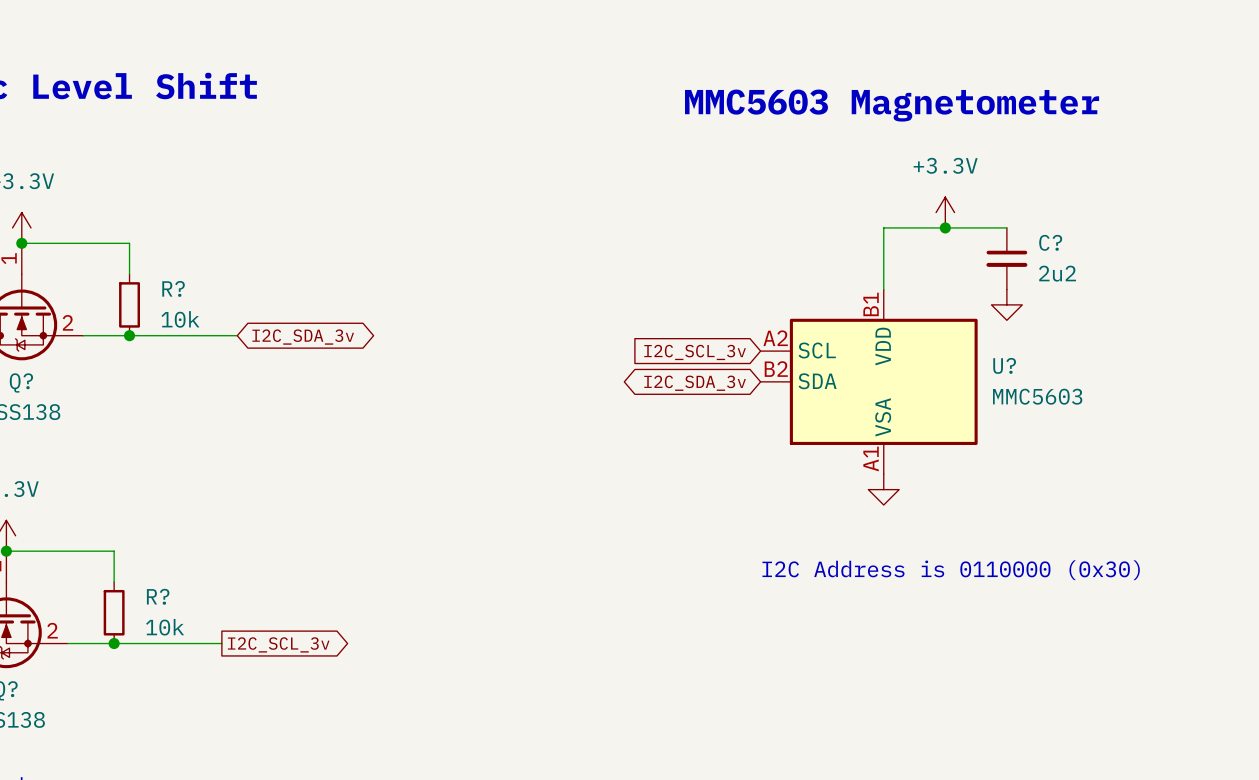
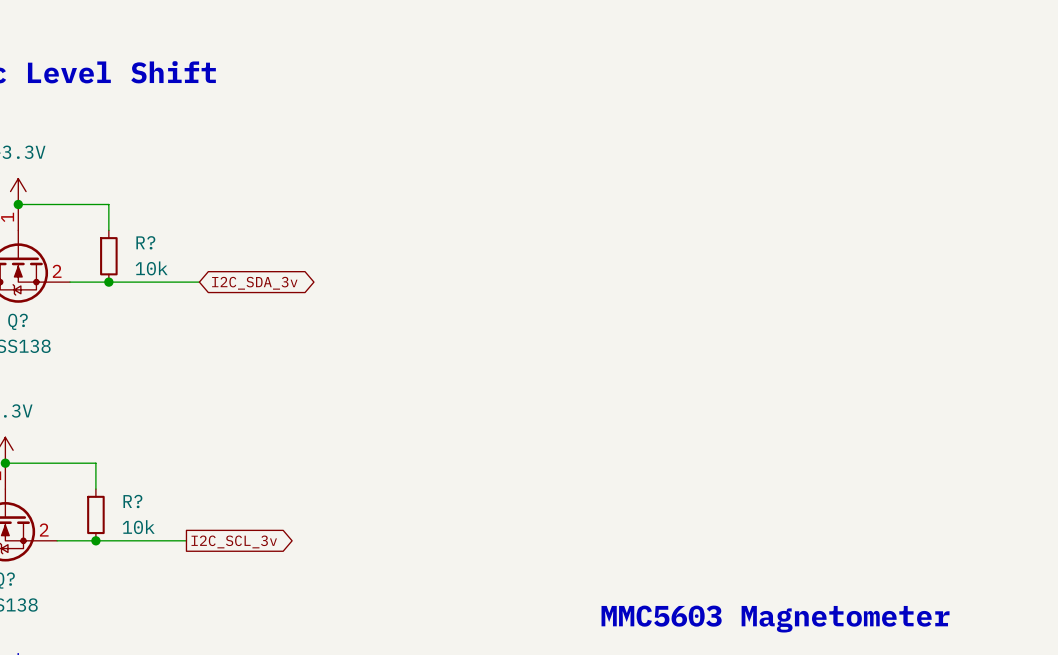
text: MMC5603 Magnetometer (892, 105) -> none
power symbol: +3.3V (945, 212) -> none
junction: (945, 227) -> none
wire: (1006, 227) (883, 227) (883, 289) -> none
C?: 2u2 (1006, 258) -> none
power symbol: (1006, 304) -> none
global label: I2C_SCL_3v (695, 352) -> none
U?: MMC5603 (869, 381) -> none
global label: I2C_SDA_3v (695, 383) -> none
power symbol: (883, 489) -> none
text: I2C Address is 0110000 (0x30) (951, 570) -> none
text: none -> MMC5603 Magnetometer (775, 619)

